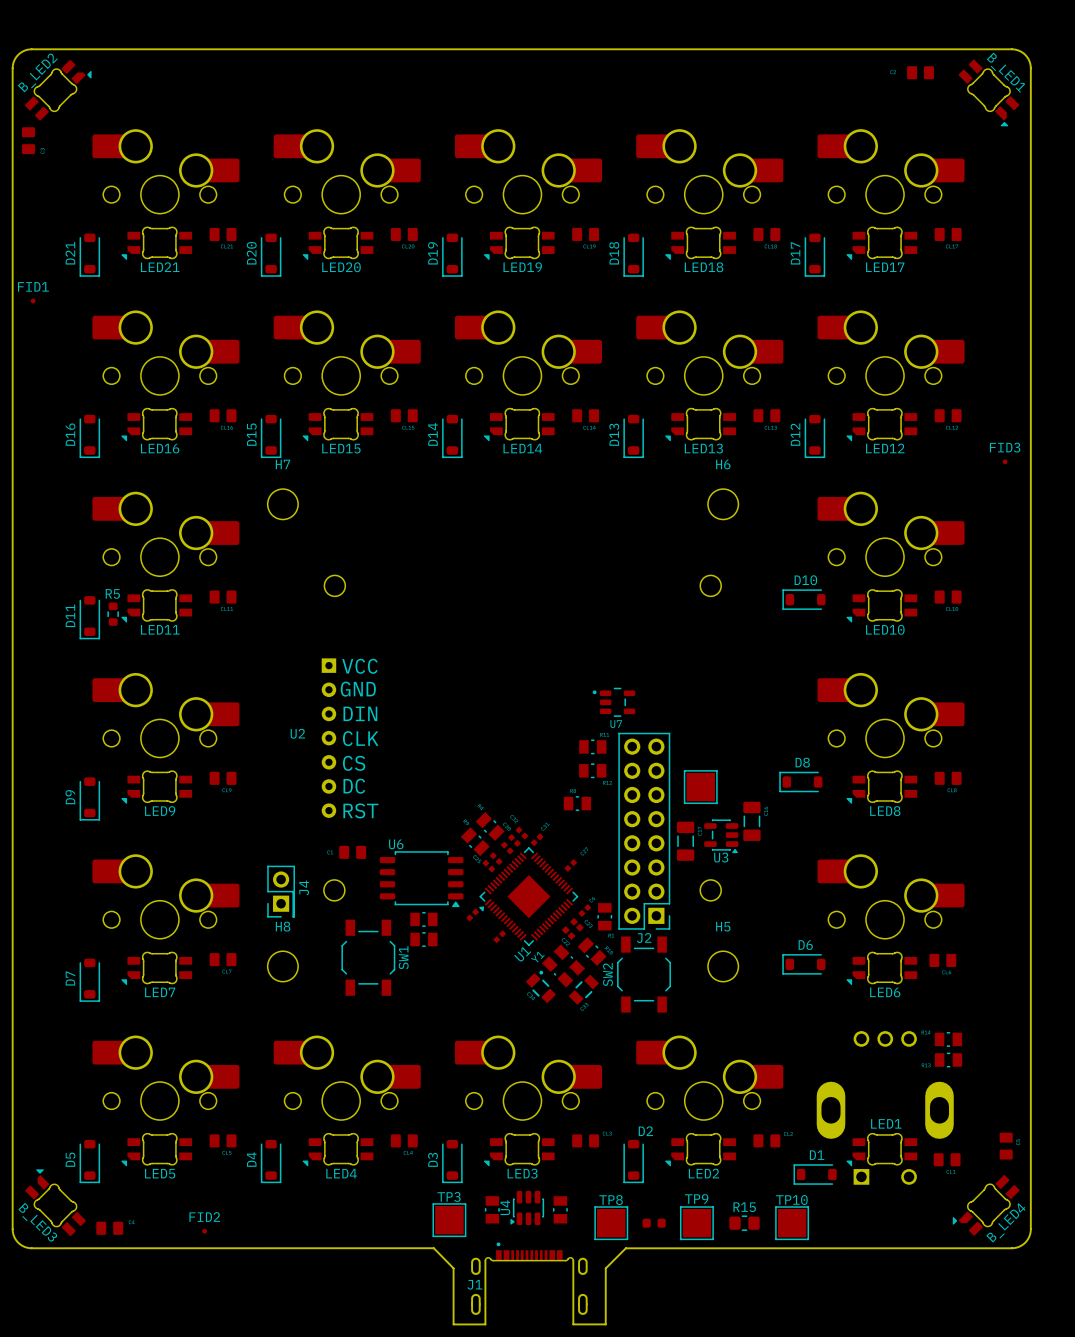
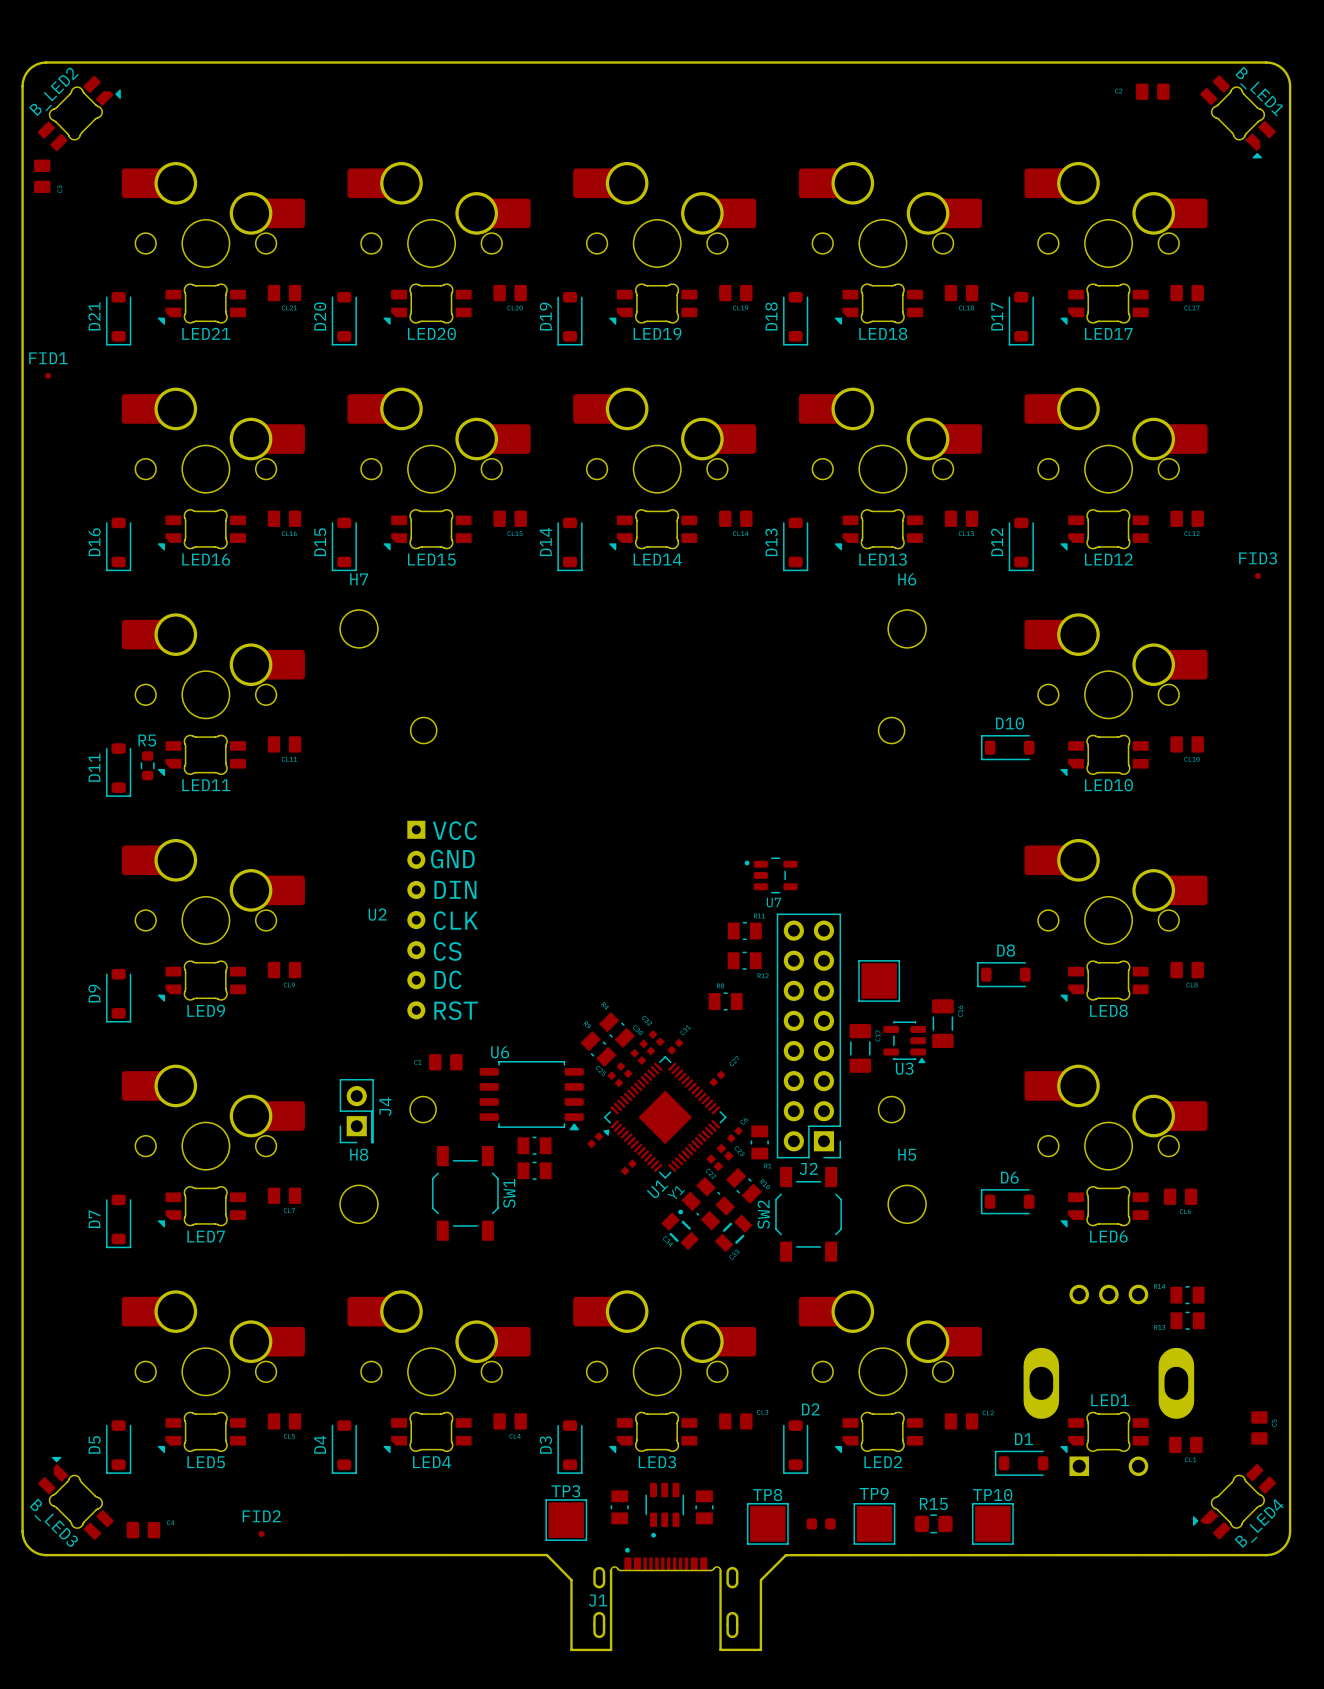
U4: (527, 1207) -> none
part: none -> (664, 1510)

